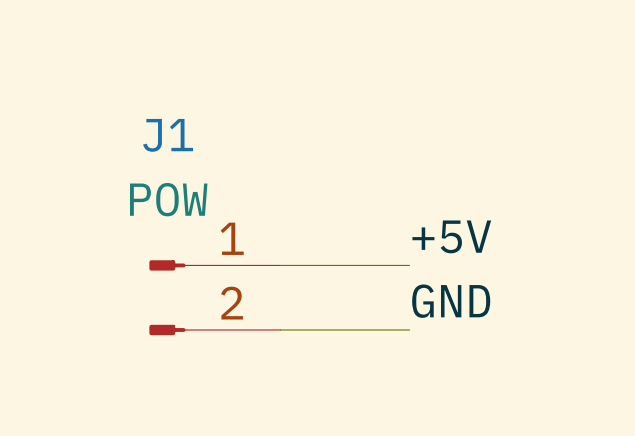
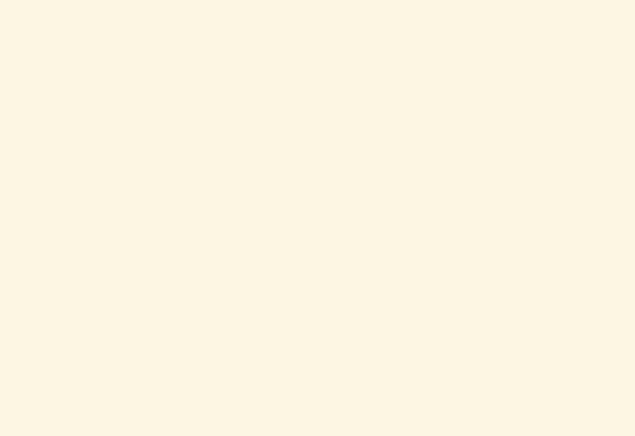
label: +5V (451, 236) -> none
wire: (280, 265) (409, 265) -> none
J1: POW (214, 297) -> none
label: GND (451, 301) -> none
wire: (280, 329) (409, 329) -> none

